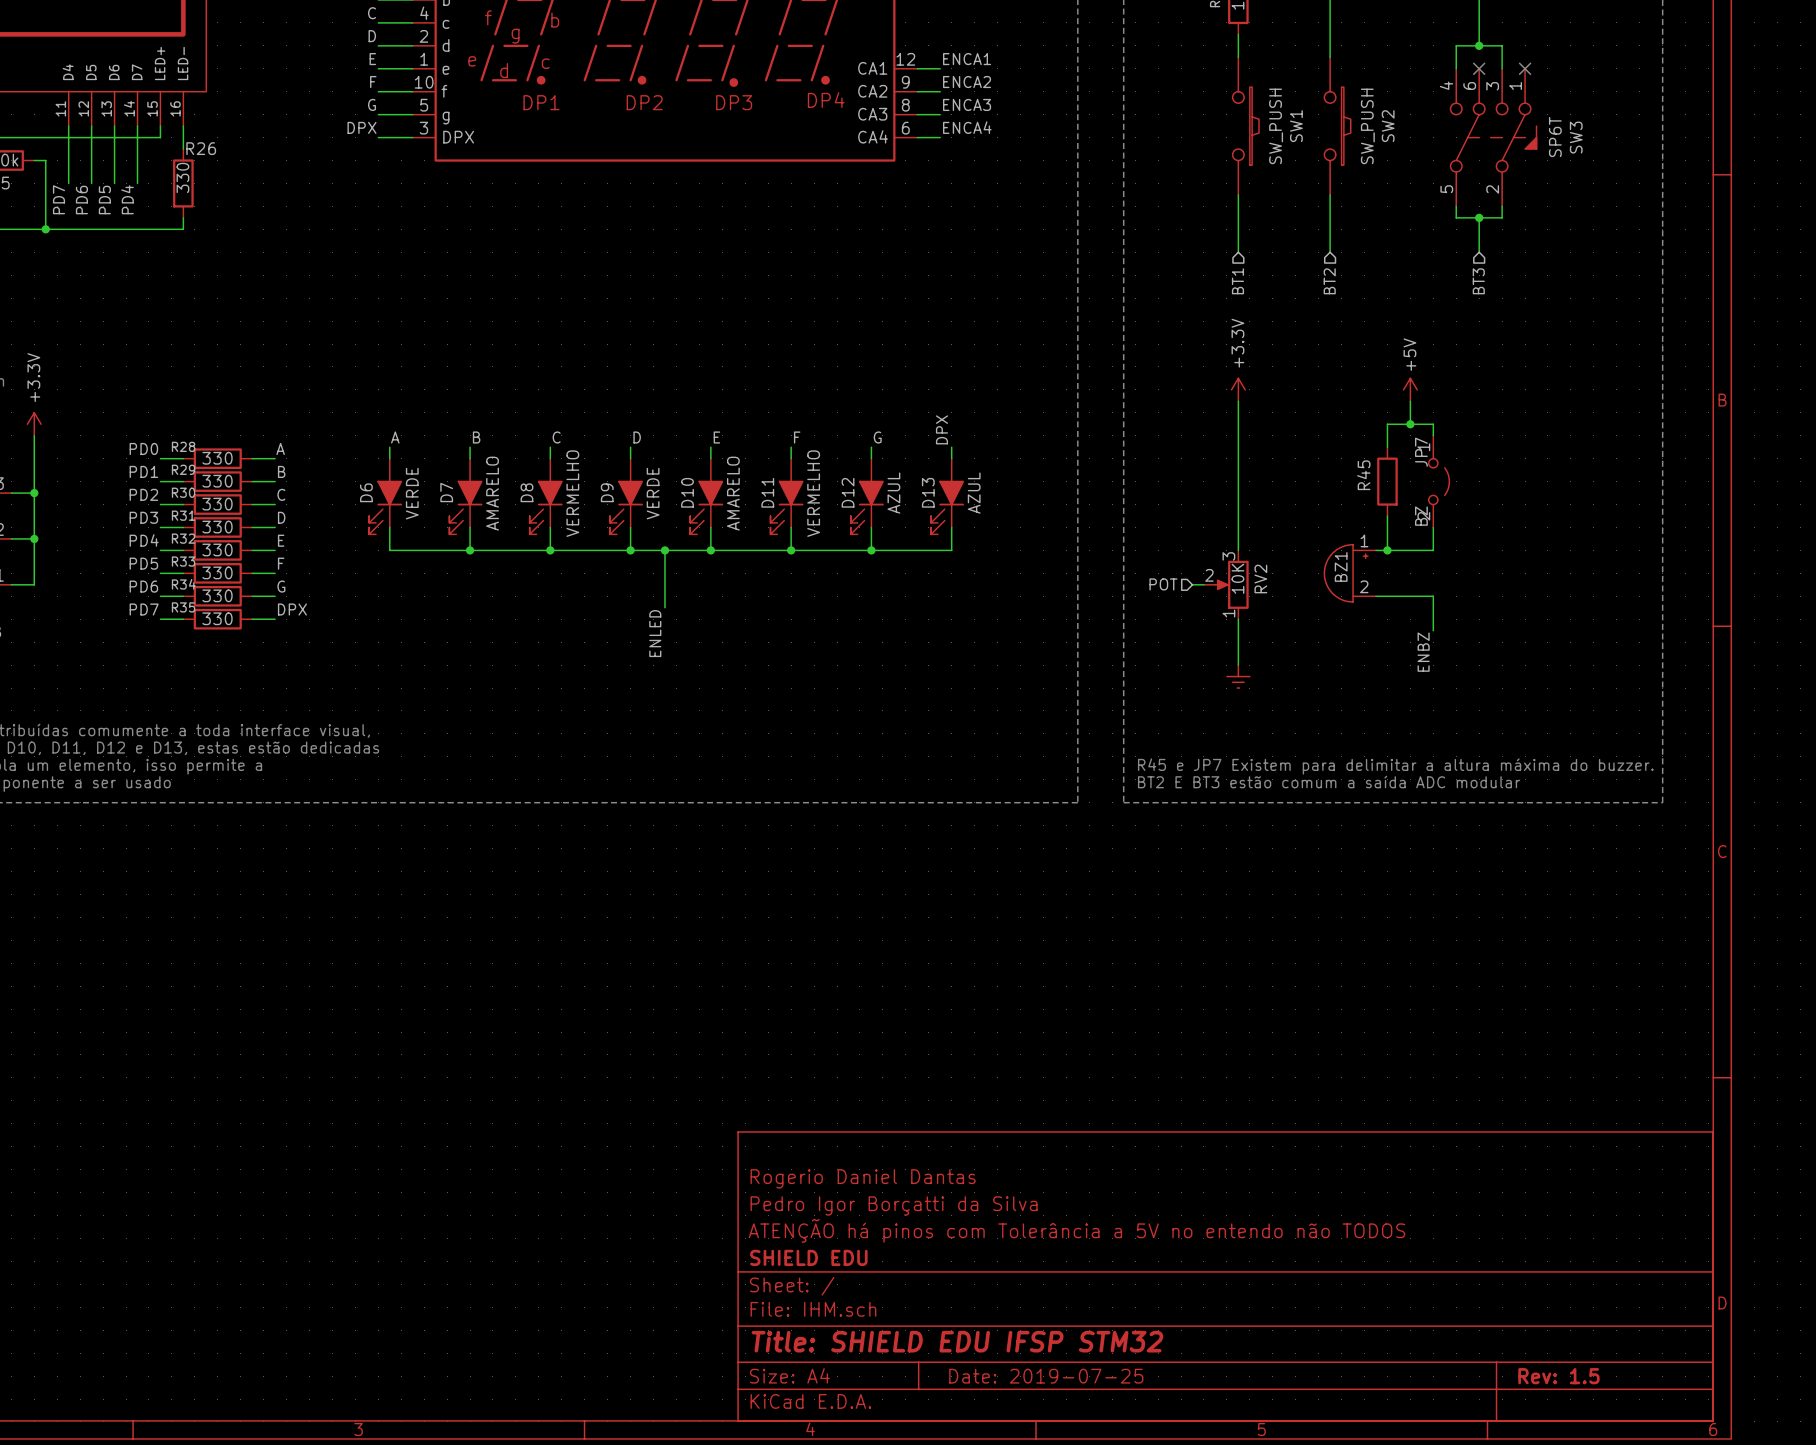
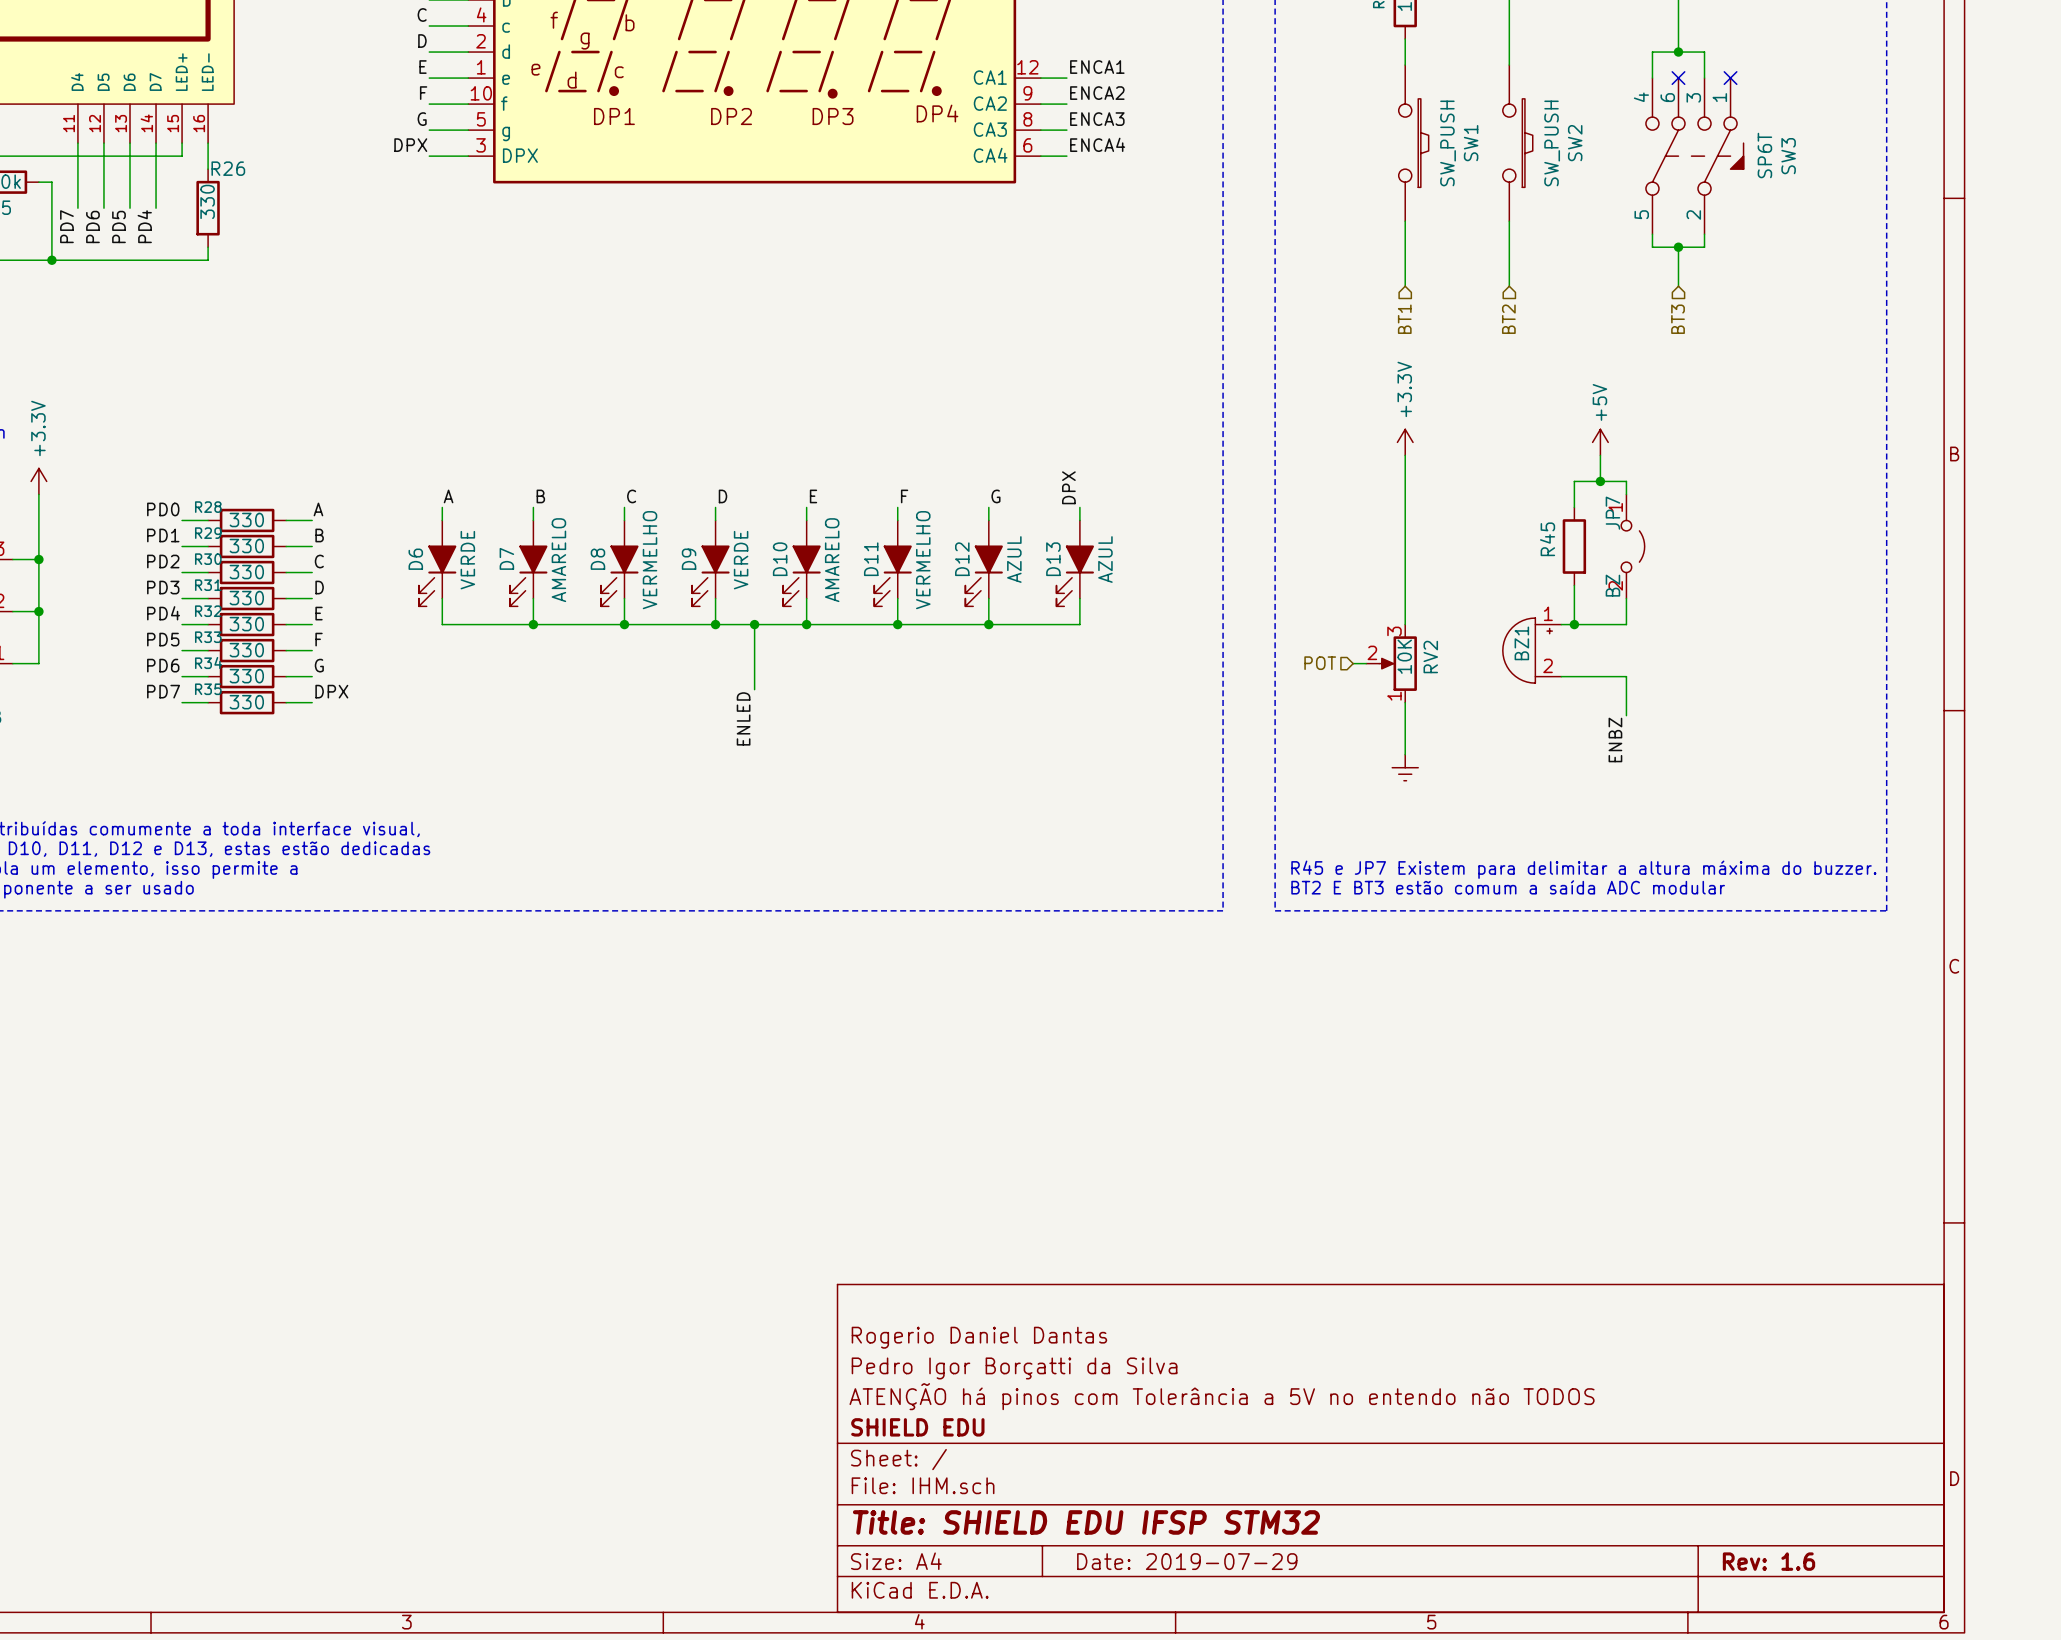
title block: Date: 2019-07-25 (1046, 1376) -> Date: 2019-07-29 (1187, 1561)
title block: Rev: 1.5 (1558, 1376) -> Rev: 1.6 (1769, 1561)

